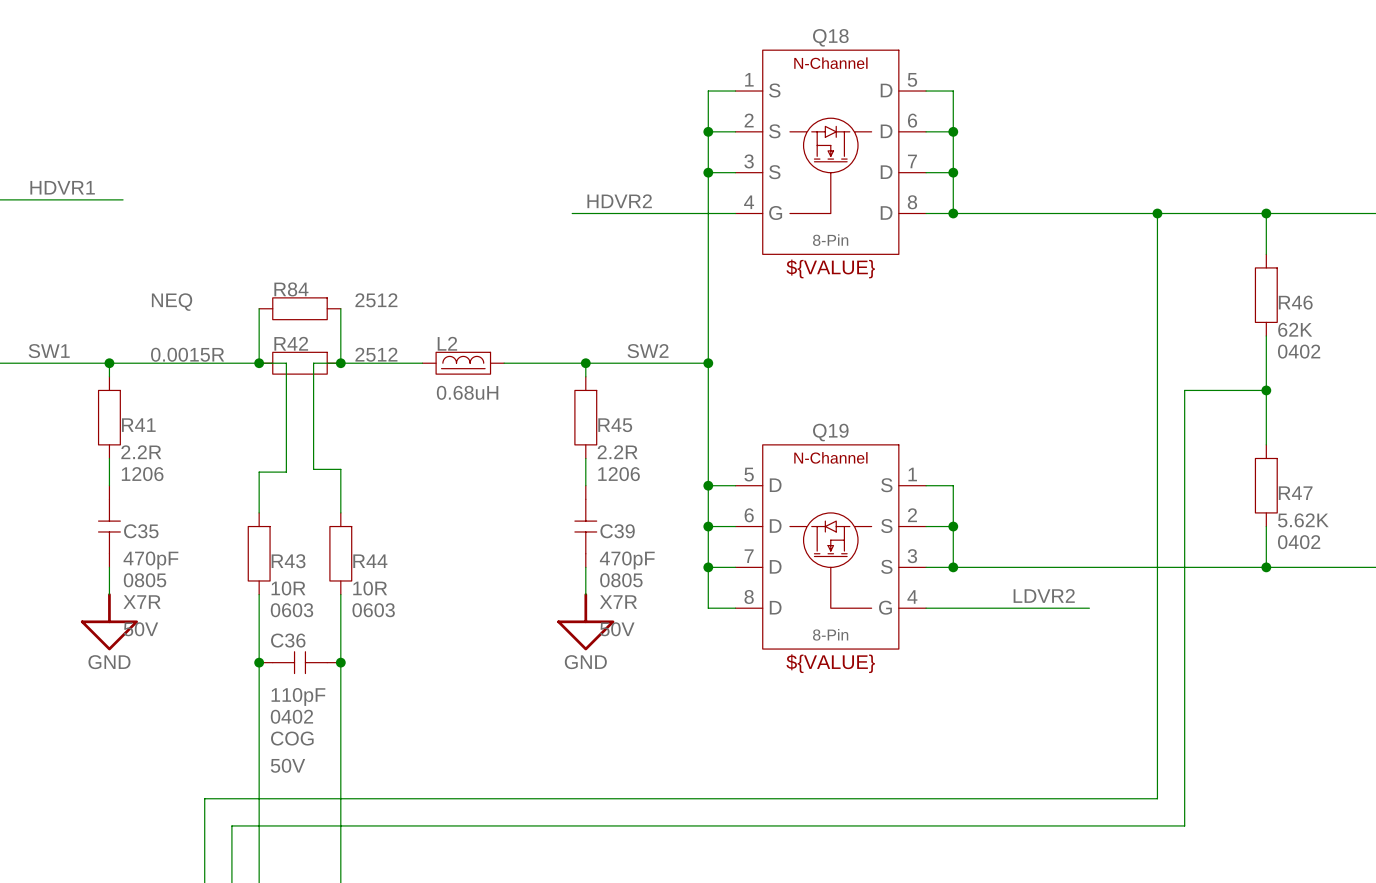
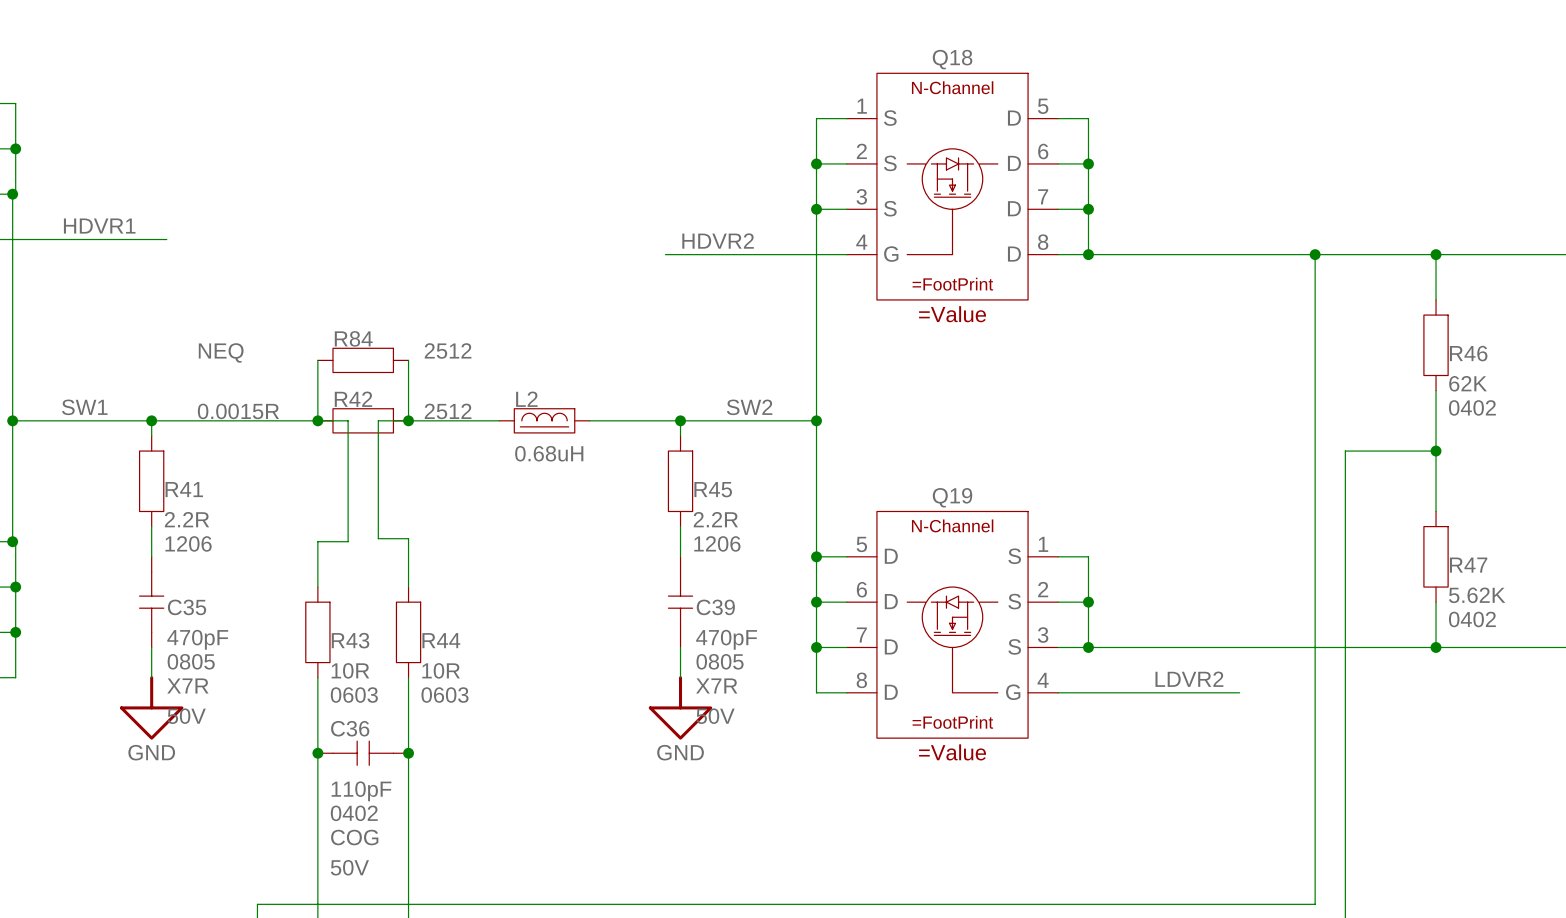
Q18 text: 8-Pin (830, 240) -> none
Q18 text: none -> =FootPrint (952, 284)
Q18 text: ${VALUE} (830, 268) -> =Value (952, 314)
Q19 text: 8-Pin (830, 634) -> none
Q19 text: none -> =FootPrint (952, 722)
Q19 text: ${VALUE} (830, 663) -> =Value (952, 752)

